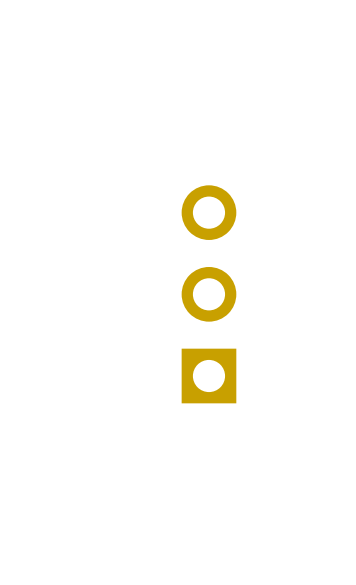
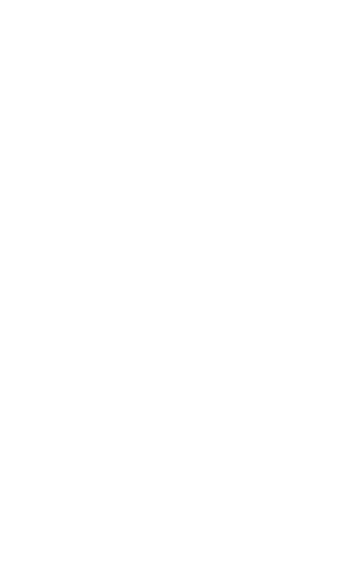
part: (208, 294) -> none

